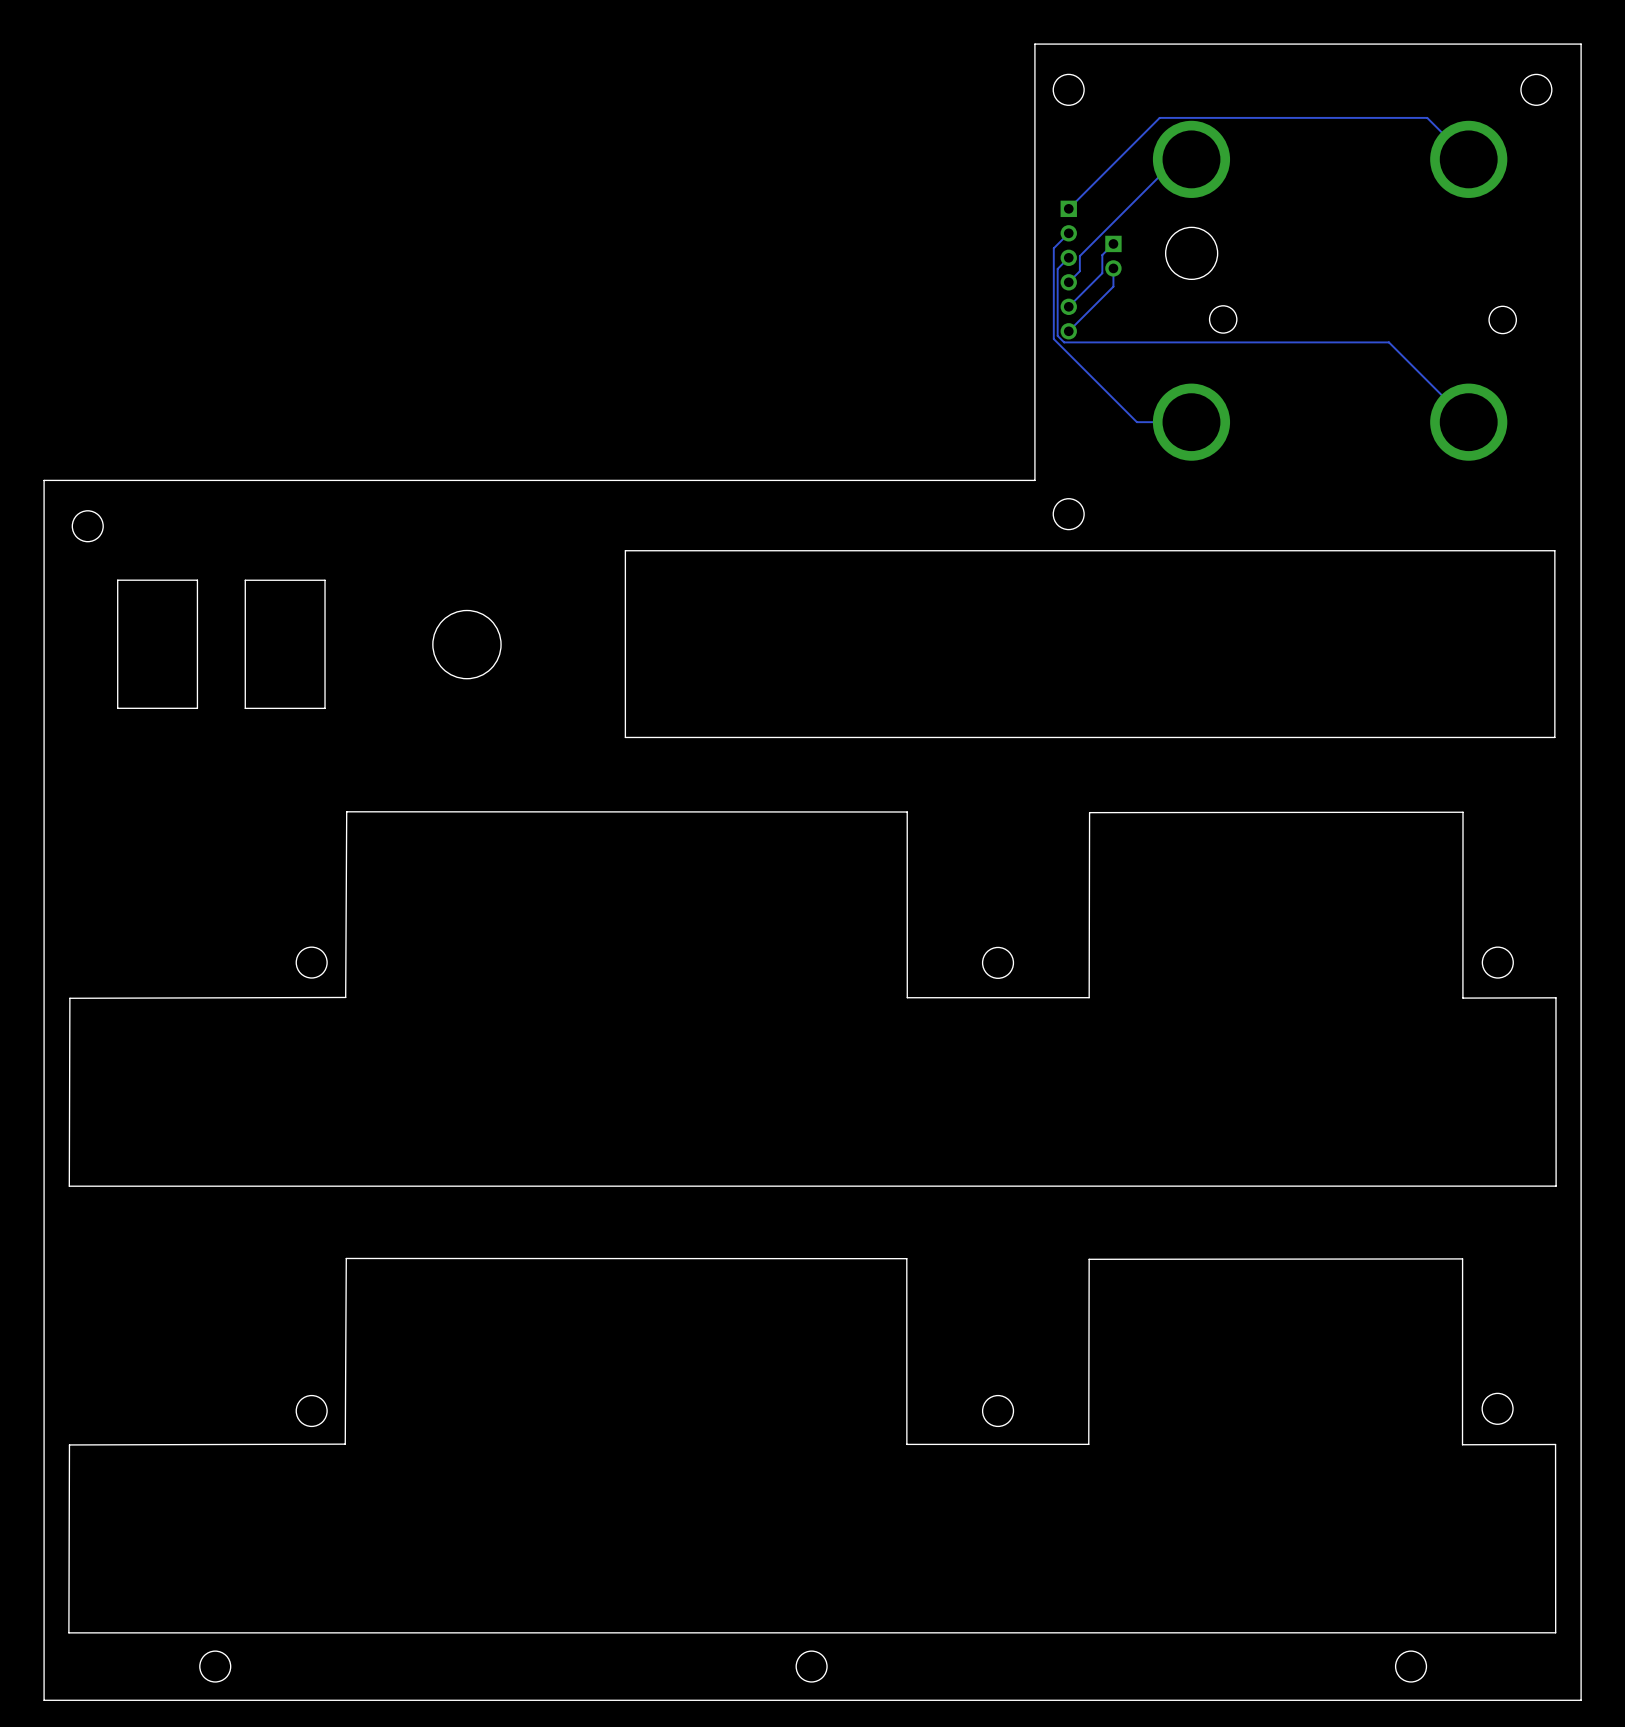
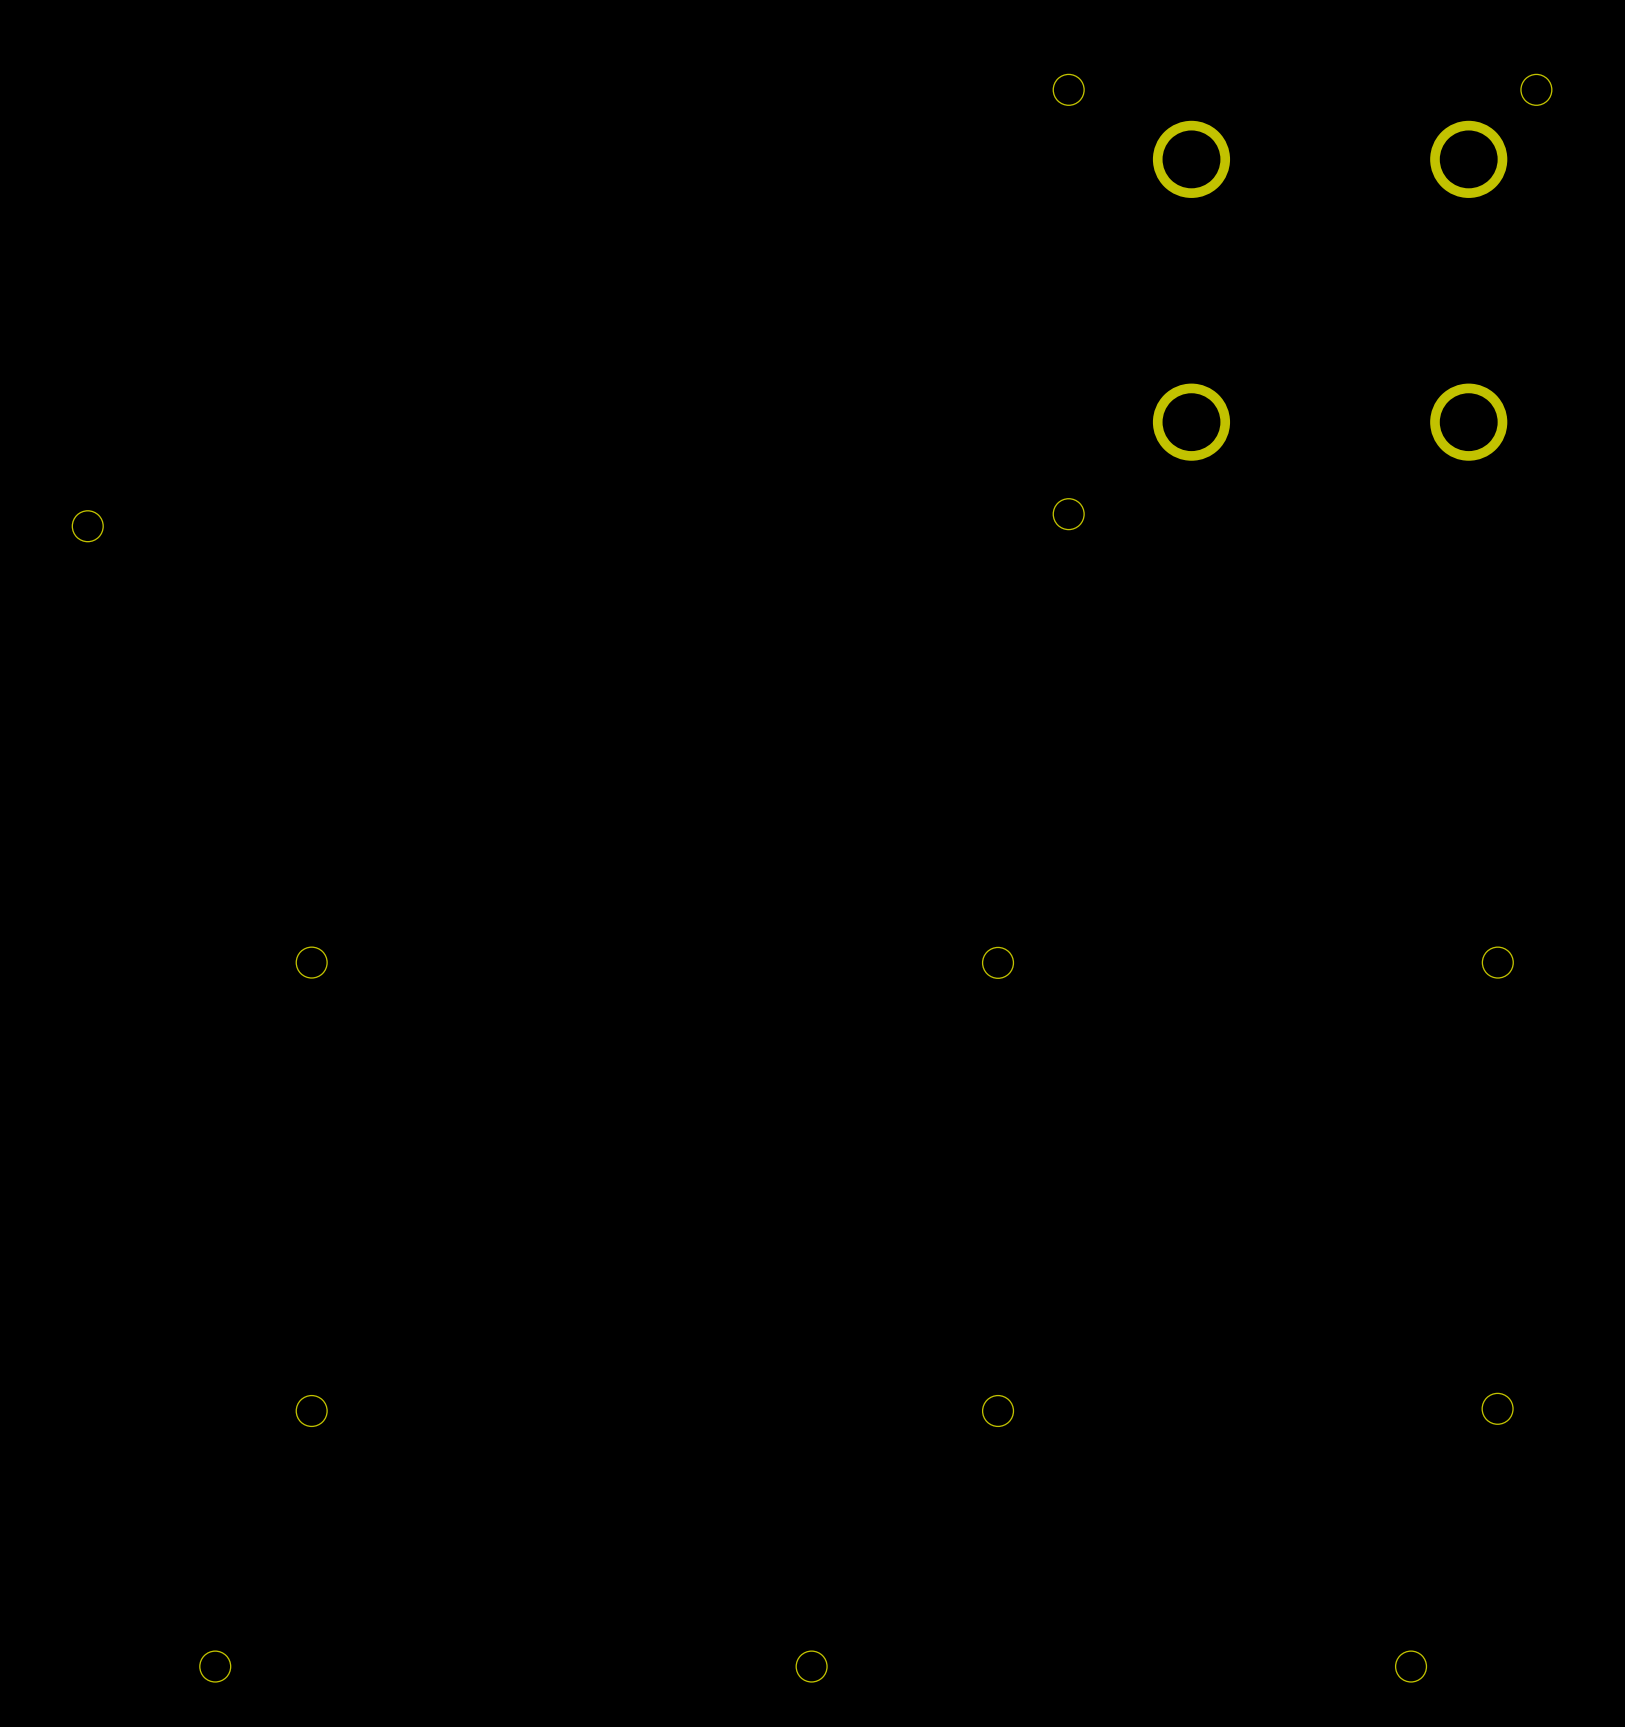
board edge: (1581, 44) (1034, 44) (1034, 480) (44, 480) (44, 1700) (1581, 1700) (1581, 44) -> none
bottom track: (1191, 159) (1176, 159) (1079, 256) (1079, 271) (1068, 282) -> none
bottom track: (1468, 159) (1427, 117) (1159, 117) (1068, 208) -> none
round board edge: [1165, 227, 1218, 280] -> none
bottom track: (1068, 233) (1053, 248) (1053, 339) (1136, 422) (1191, 422) -> none
bottom track: (1113, 243) (1102, 255) (1102, 273) (1068, 306) -> none
part: (1113, 256) -> none
bottom track: (1068, 257) (1057, 268) (1057, 335) (1064, 342) (1388, 342) (1468, 422) -> none
bottom track: (1113, 268) (1113, 286) (1068, 331) -> none
part: (1068, 270) -> none
round board edge: [1209, 305, 1238, 334] -> none
round board edge: [1488, 306, 1517, 334] -> none
board edge: (1554, 550) (625, 550) (625, 737) (1554, 737) (1554, 550) -> none
board edge: (197, 580) (117, 580) (117, 708) (197, 708) (197, 580) -> none
board edge: (325, 580) (245, 580) (245, 708) (325, 708) (325, 580) -> none
round board edge: [432, 610, 502, 679] -> none
board edge: (346, 811) (345, 997) (69, 998) (69, 1186) (1556, 1186) (1555, 997) (1462, 998) (1463, 812) (1089, 812) (1089, 997) (907, 997) (907, 812) (346, 811) -> none
board edge: (346, 1258) (345, 1444) (69, 1444) (68, 1632) (1555, 1632) (1555, 1444) (1462, 1444) (1462, 1258) (1089, 1259) (1088, 1444) (906, 1444) (906, 1258) (346, 1258) -> none

